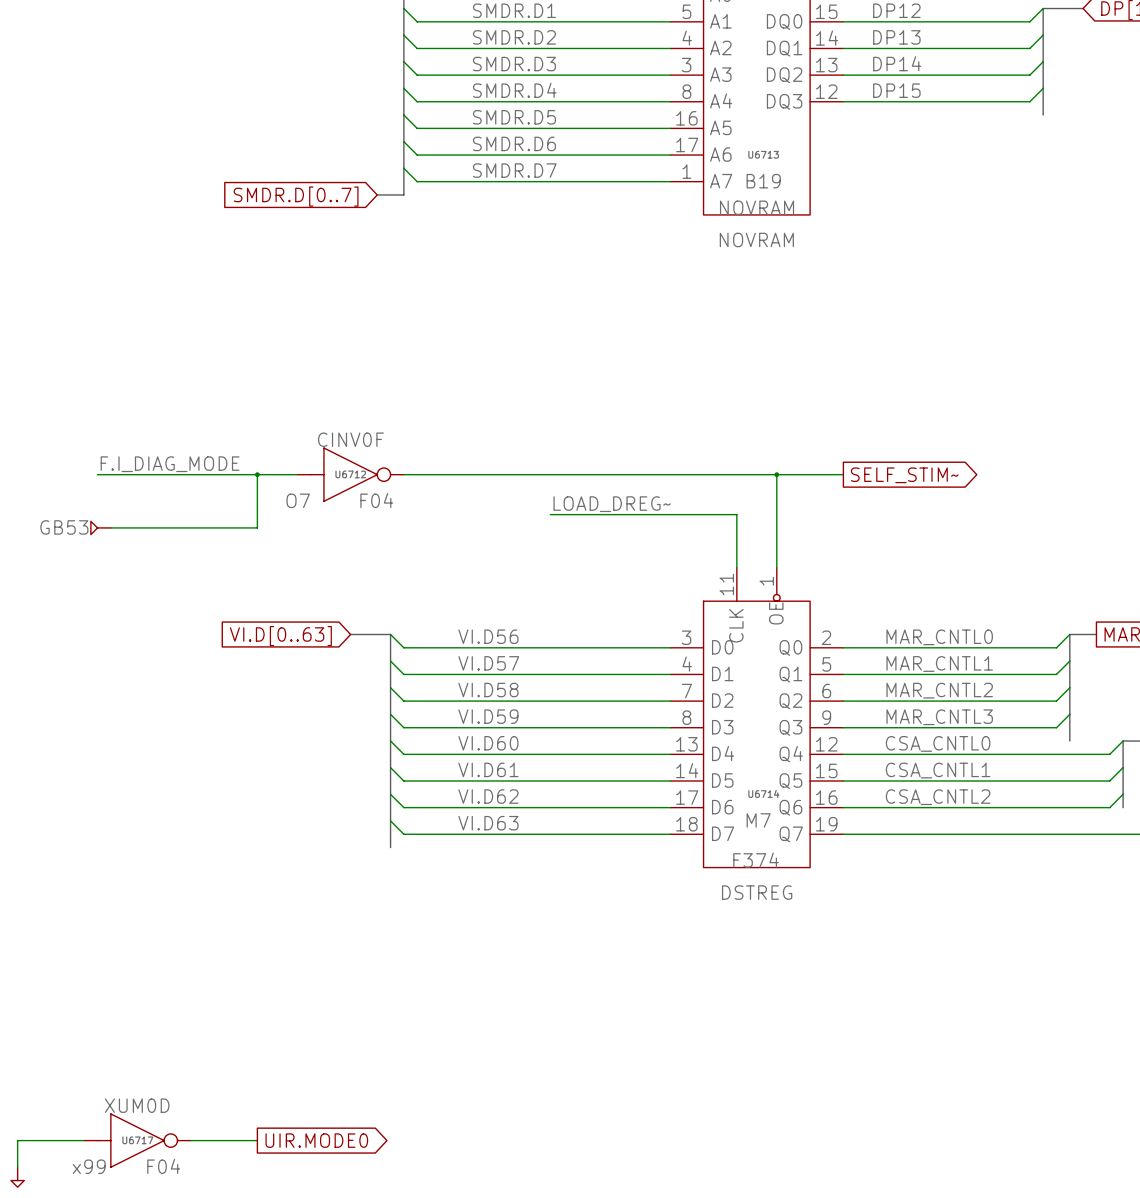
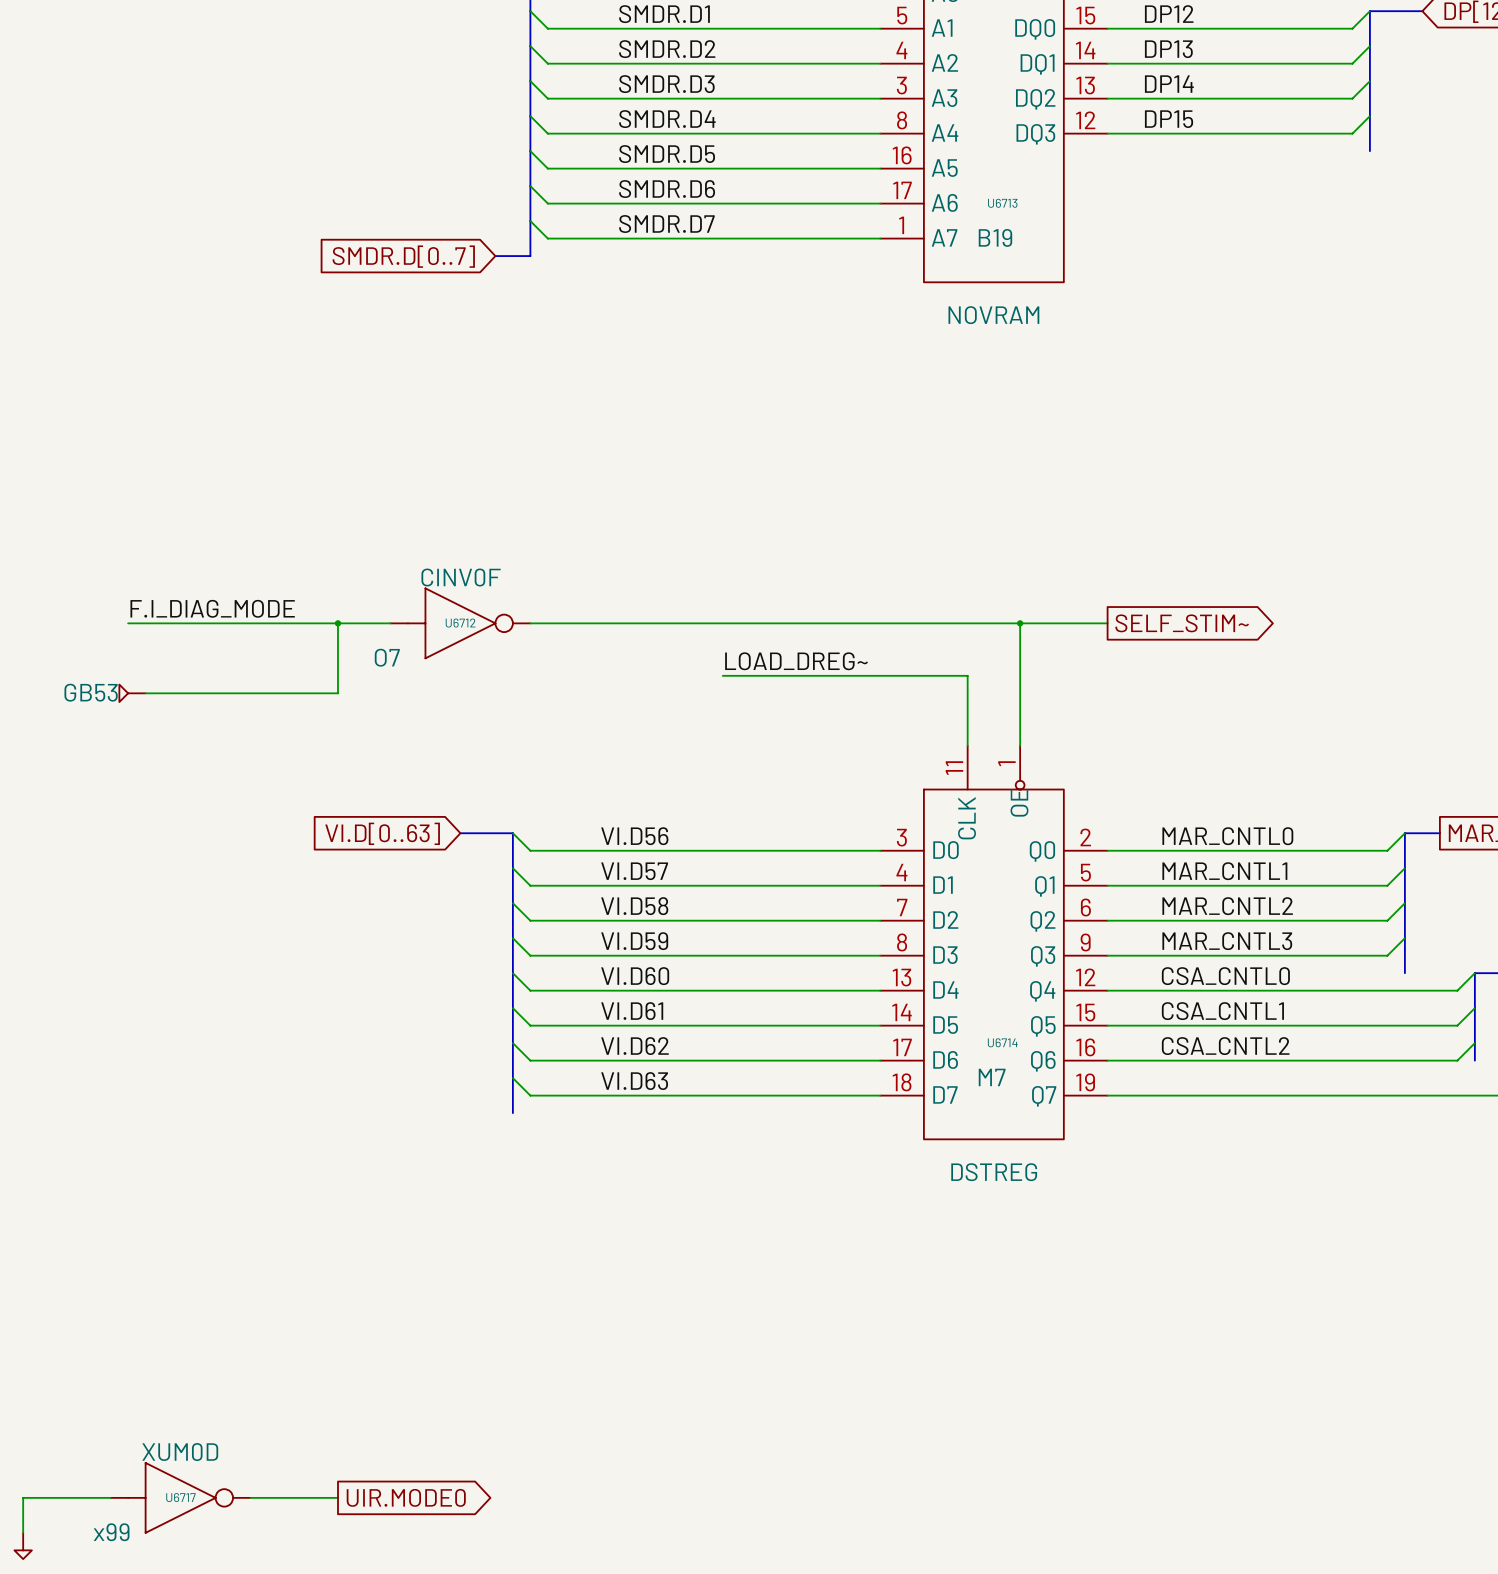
U6713 value: NOVRAM (757, 207) -> none
U6712 value: F04 (376, 500) -> none
U6714 value: F374 (756, 860) -> none
U6717 value: F04 (163, 1166) -> none

